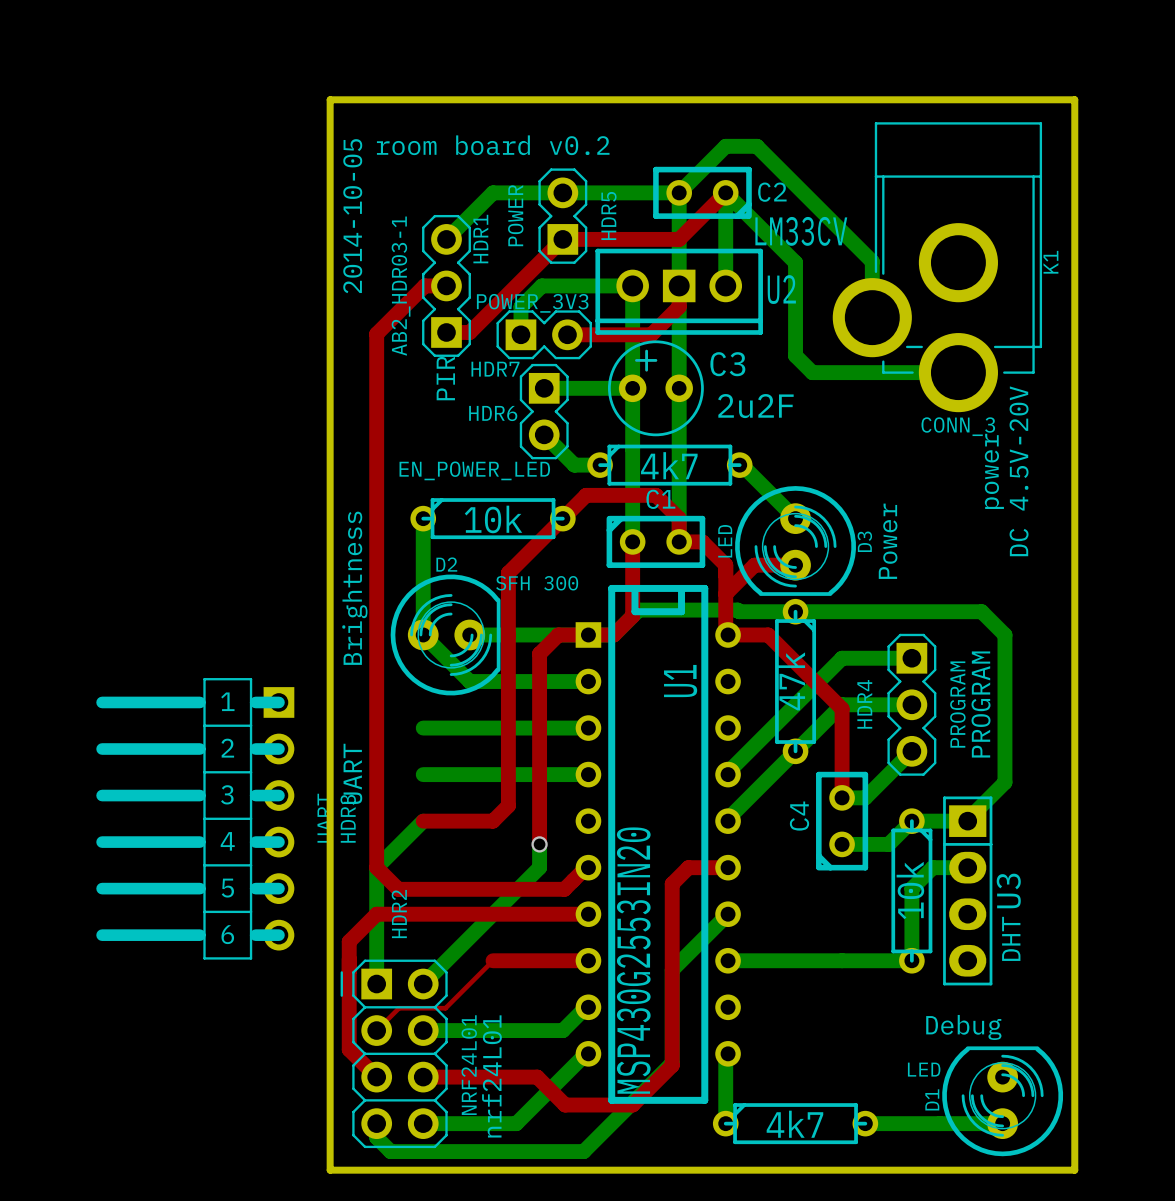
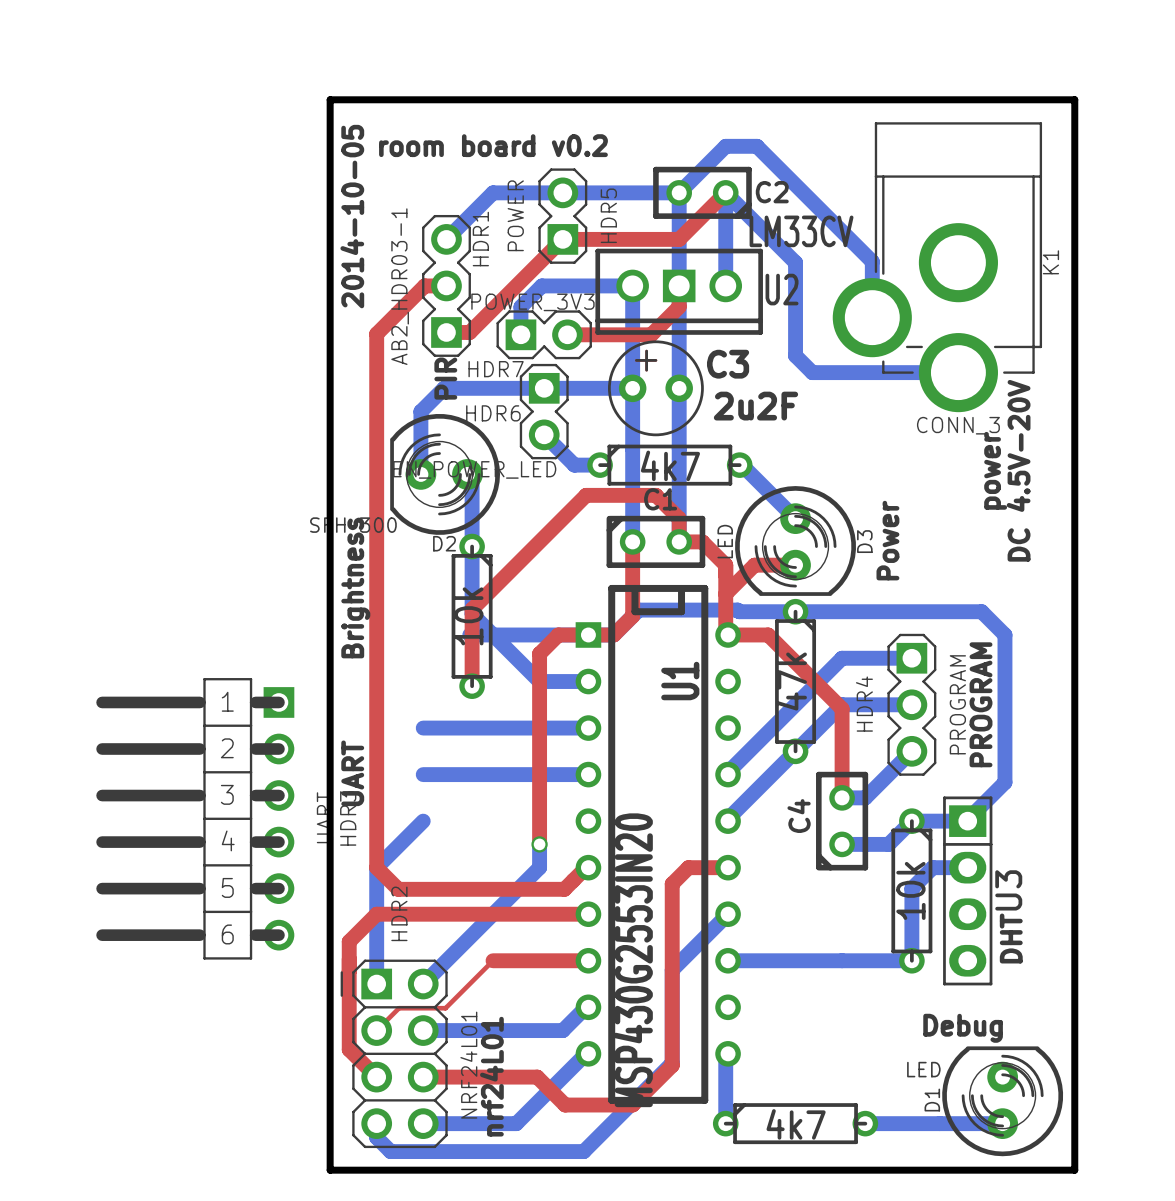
bottom track: none -> (544, 388) (444, 388) (420, 411) (420, 474)
bottom track: (423, 518) (423, 634) (469, 681) (539, 681) -> (467, 474) (472, 479) (472, 614) (539, 681)
part rotation: 0° (493, 518) -> 90° clockwise (472, 616)
part position: (493, 518) -> (472, 616)
top track: (508, 573) (508, 805) (493, 821) (423, 821) -> (508, 573) (472, 609) (472, 686)
D2 rotation: 0° (445, 634) -> 180° (445, 474)
D2 position: (445, 634) -> (445, 474)

